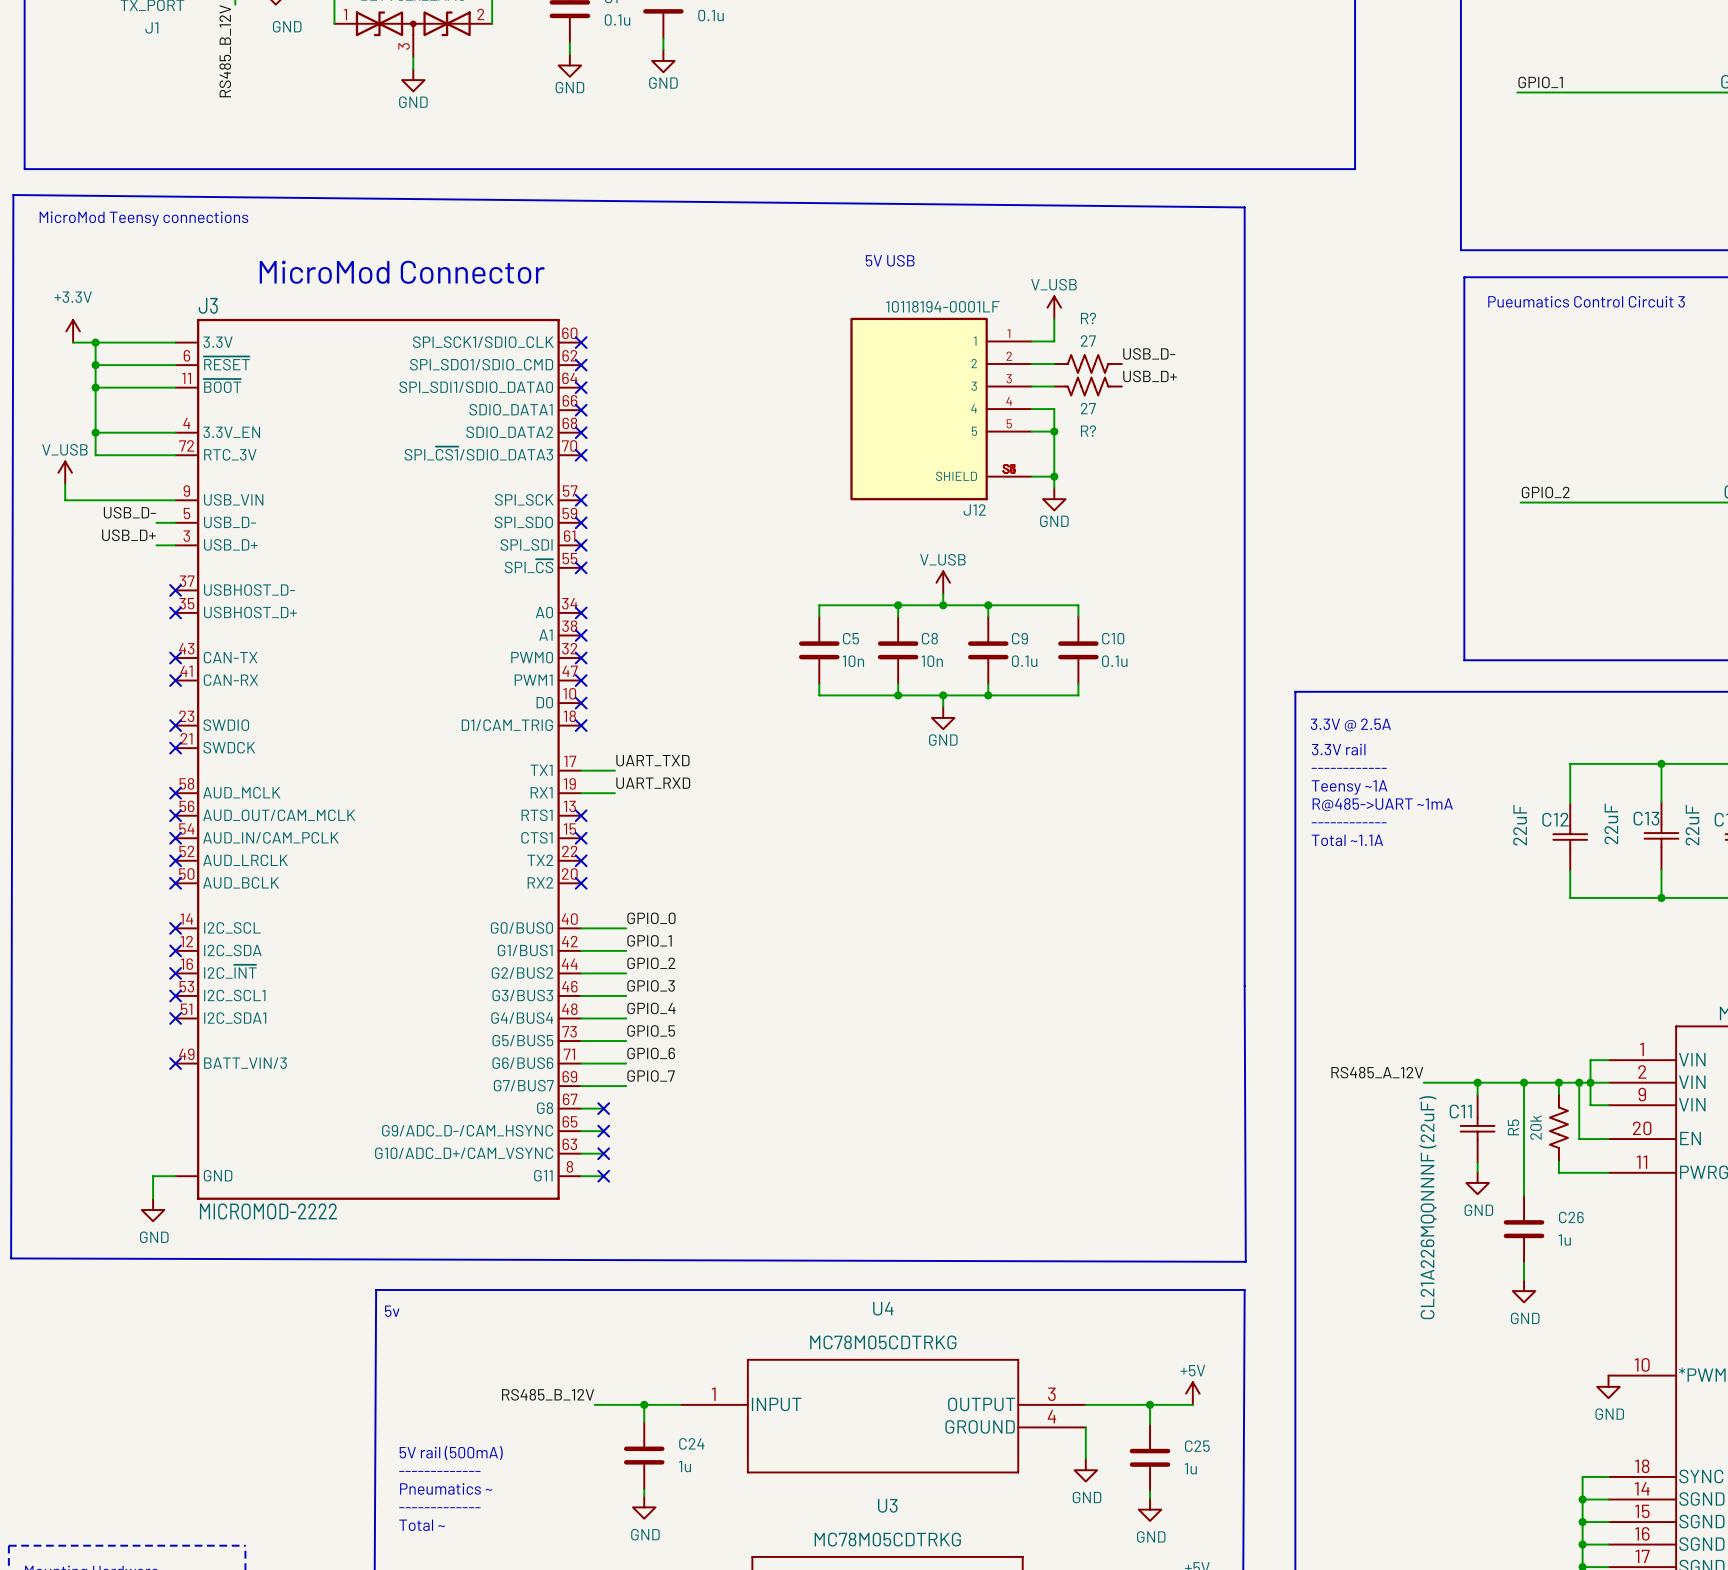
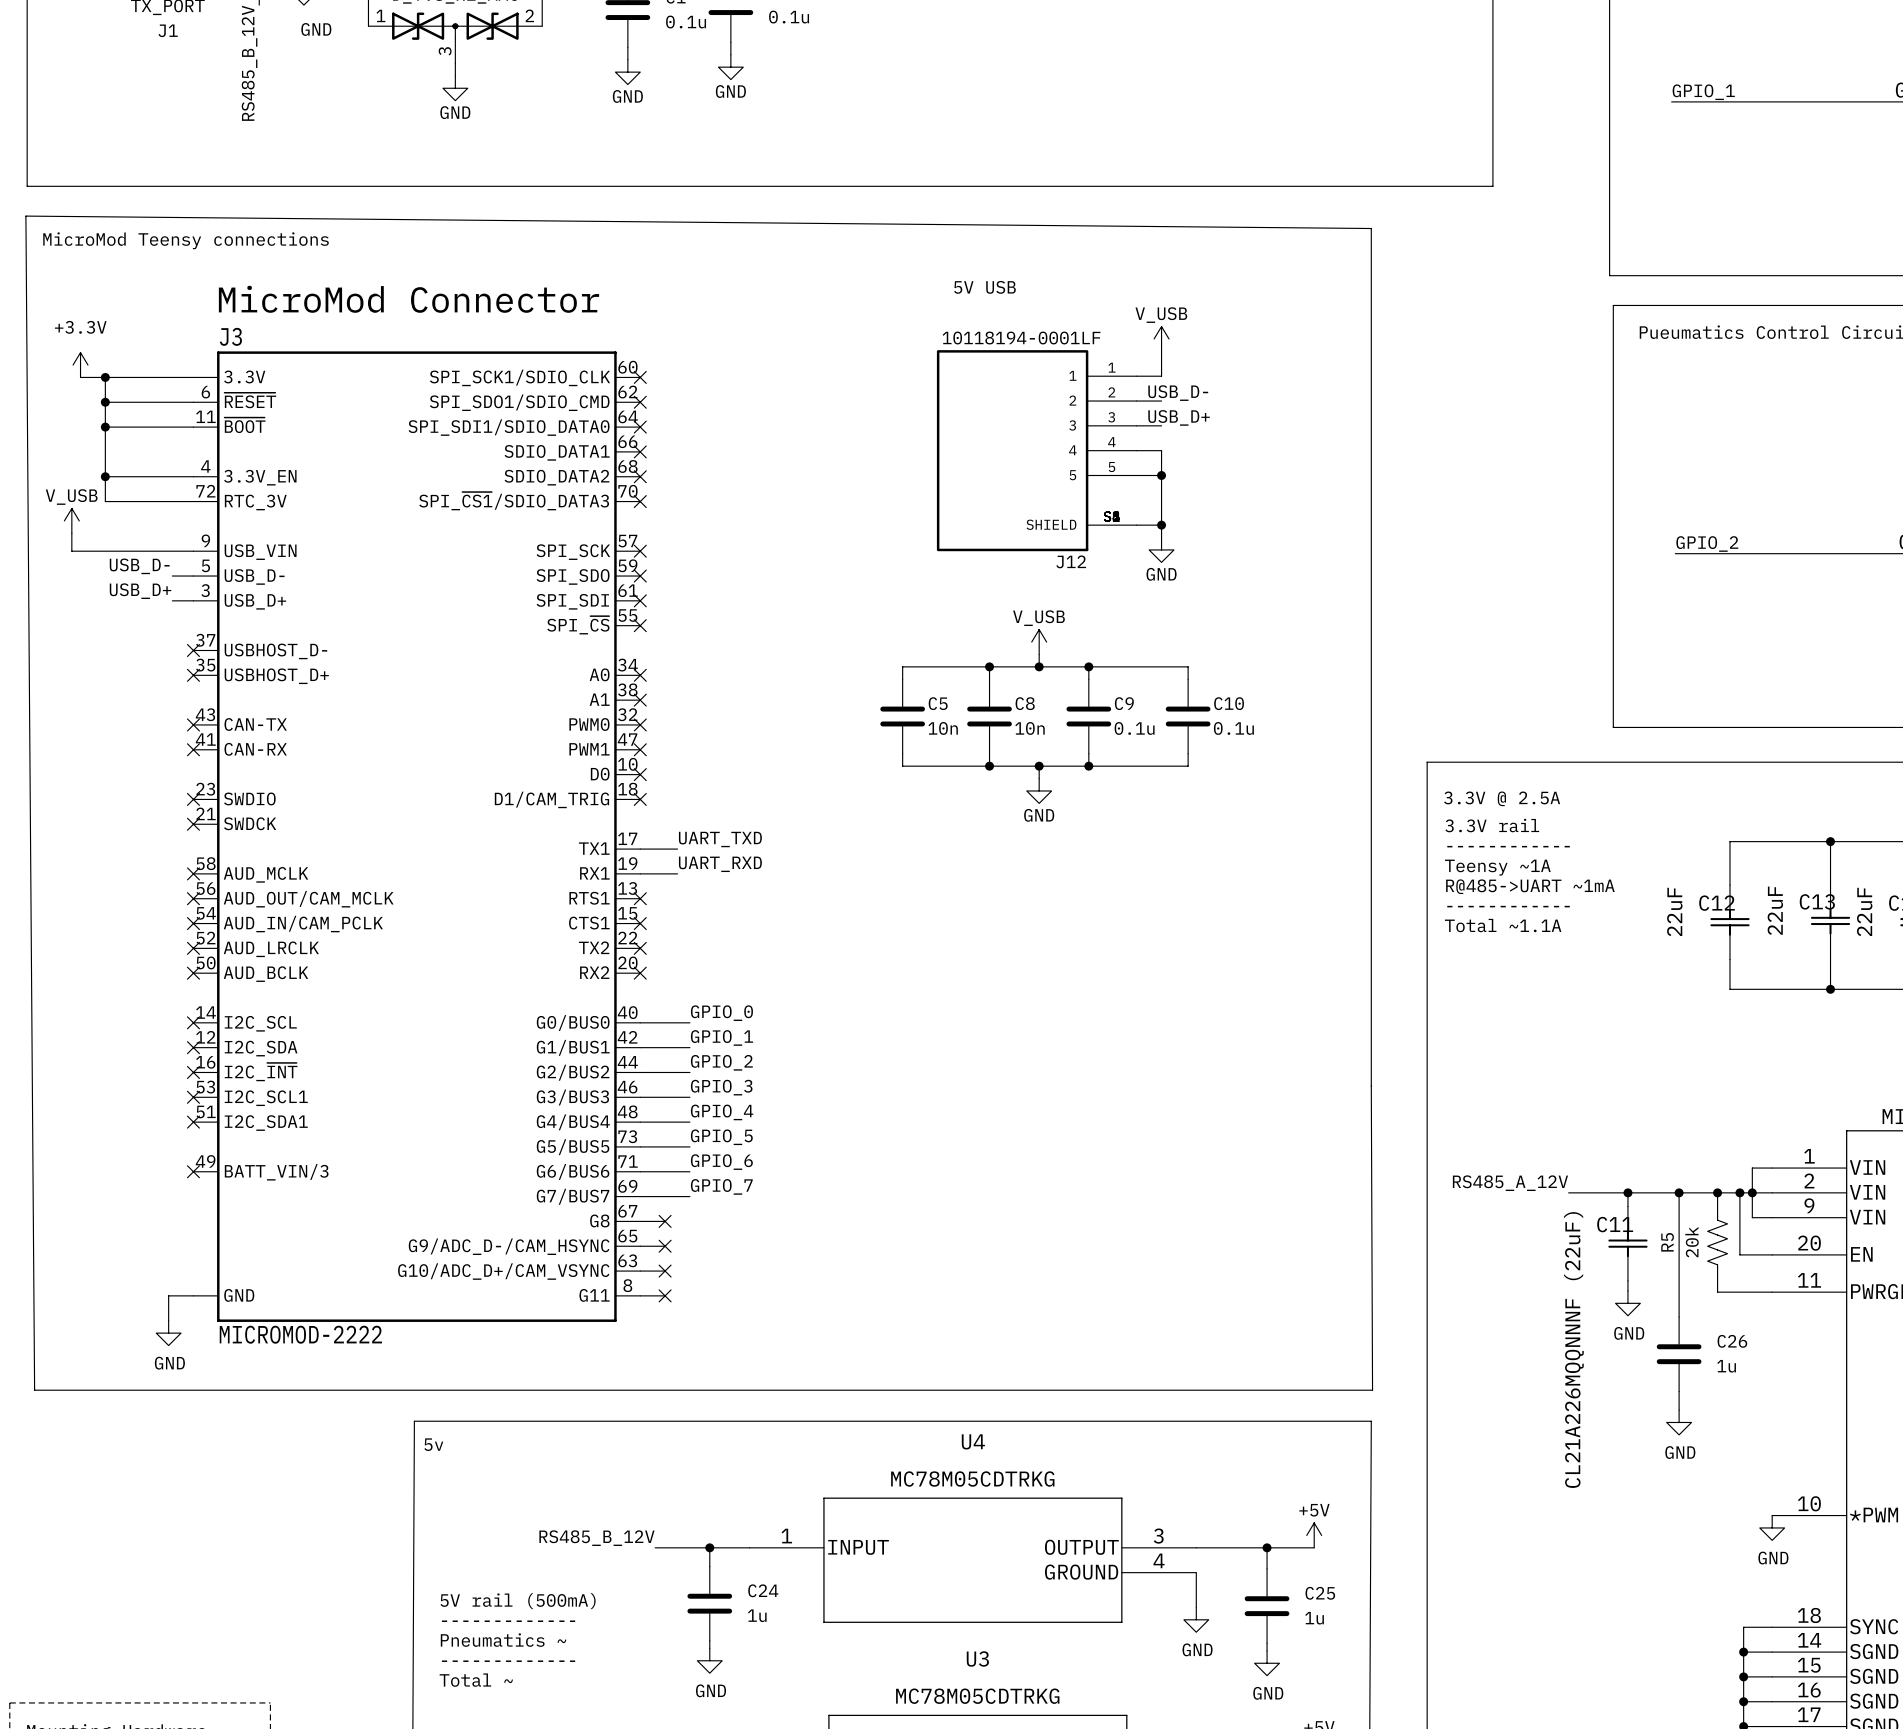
line: (1244, 207) (13, 195) (11, 1258) (1245, 1261) -> (1371, 228) (25, 216) (34, 1390) (1372, 1390)
label position: USB_D- (1149, 353) -> USB_D- (1178, 393)
R?: 27 (1088, 363) -> none
label position: USB_D+ (1150, 376) -> USB_D+ (1179, 417)
R?: 27 (1088, 386) -> none

